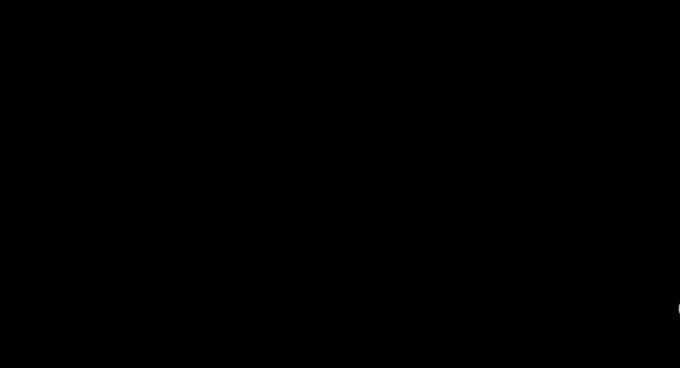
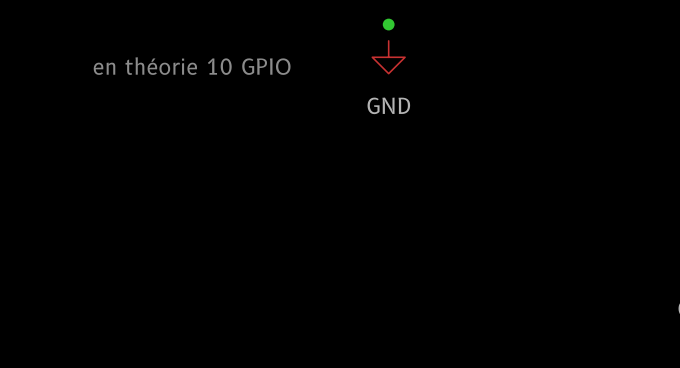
junction: none -> (388, 24)
power symbol: none -> GND (388, 57)
text: none -> en théorie 10 GPIO (192, 66)

